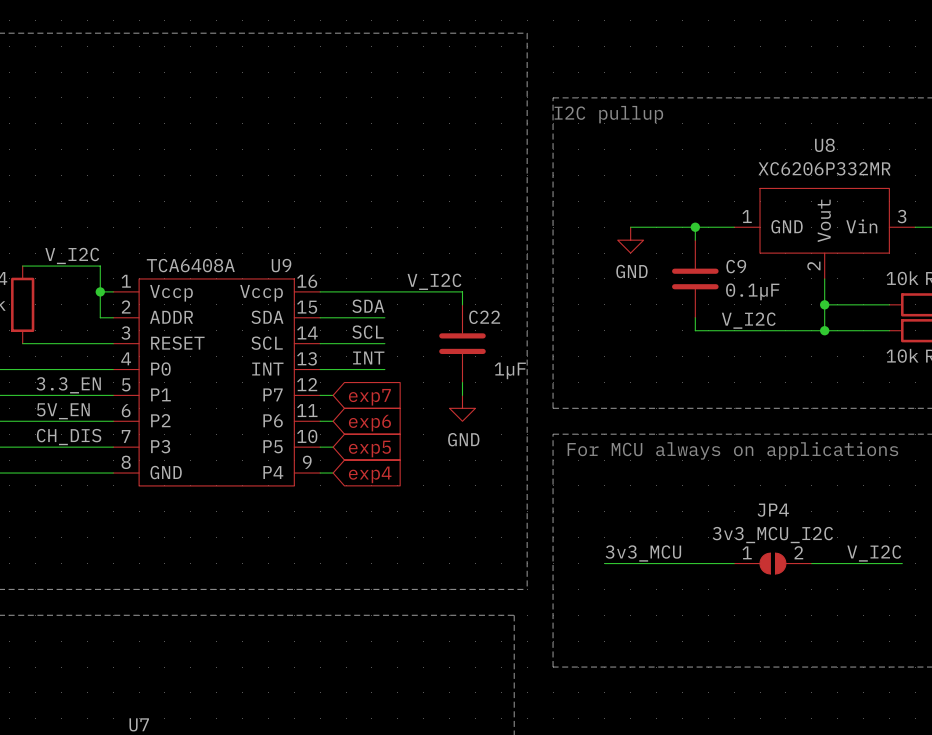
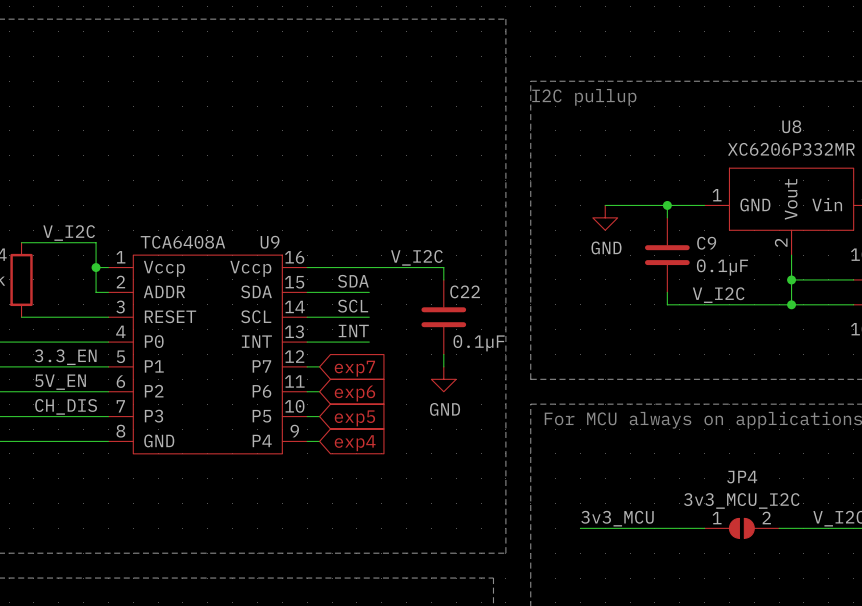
C22 value: 1µF (510, 370) -> 0.1µF (479, 343)

